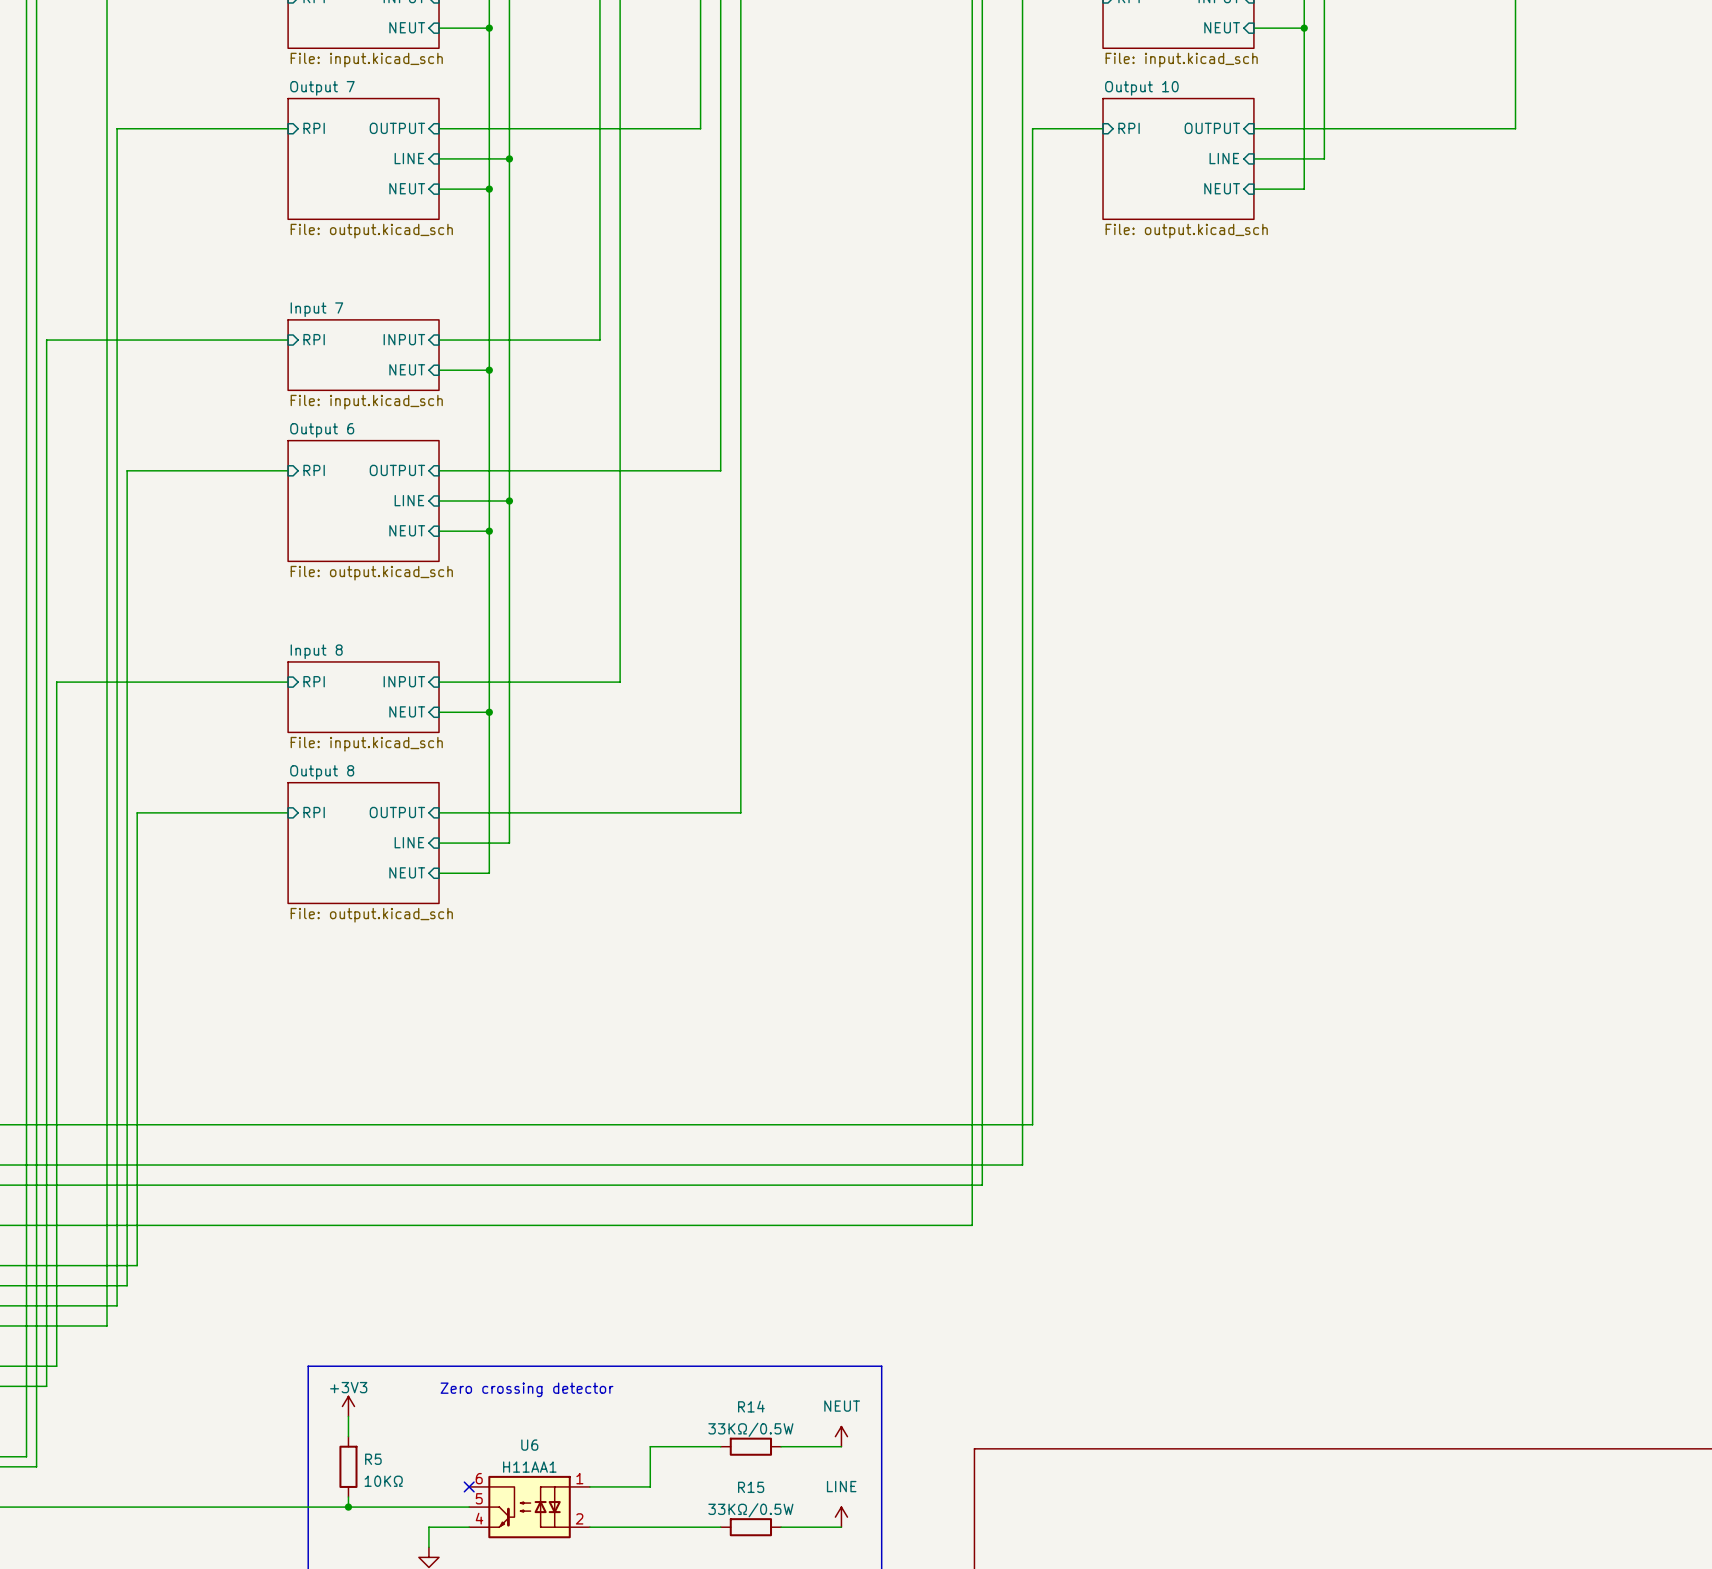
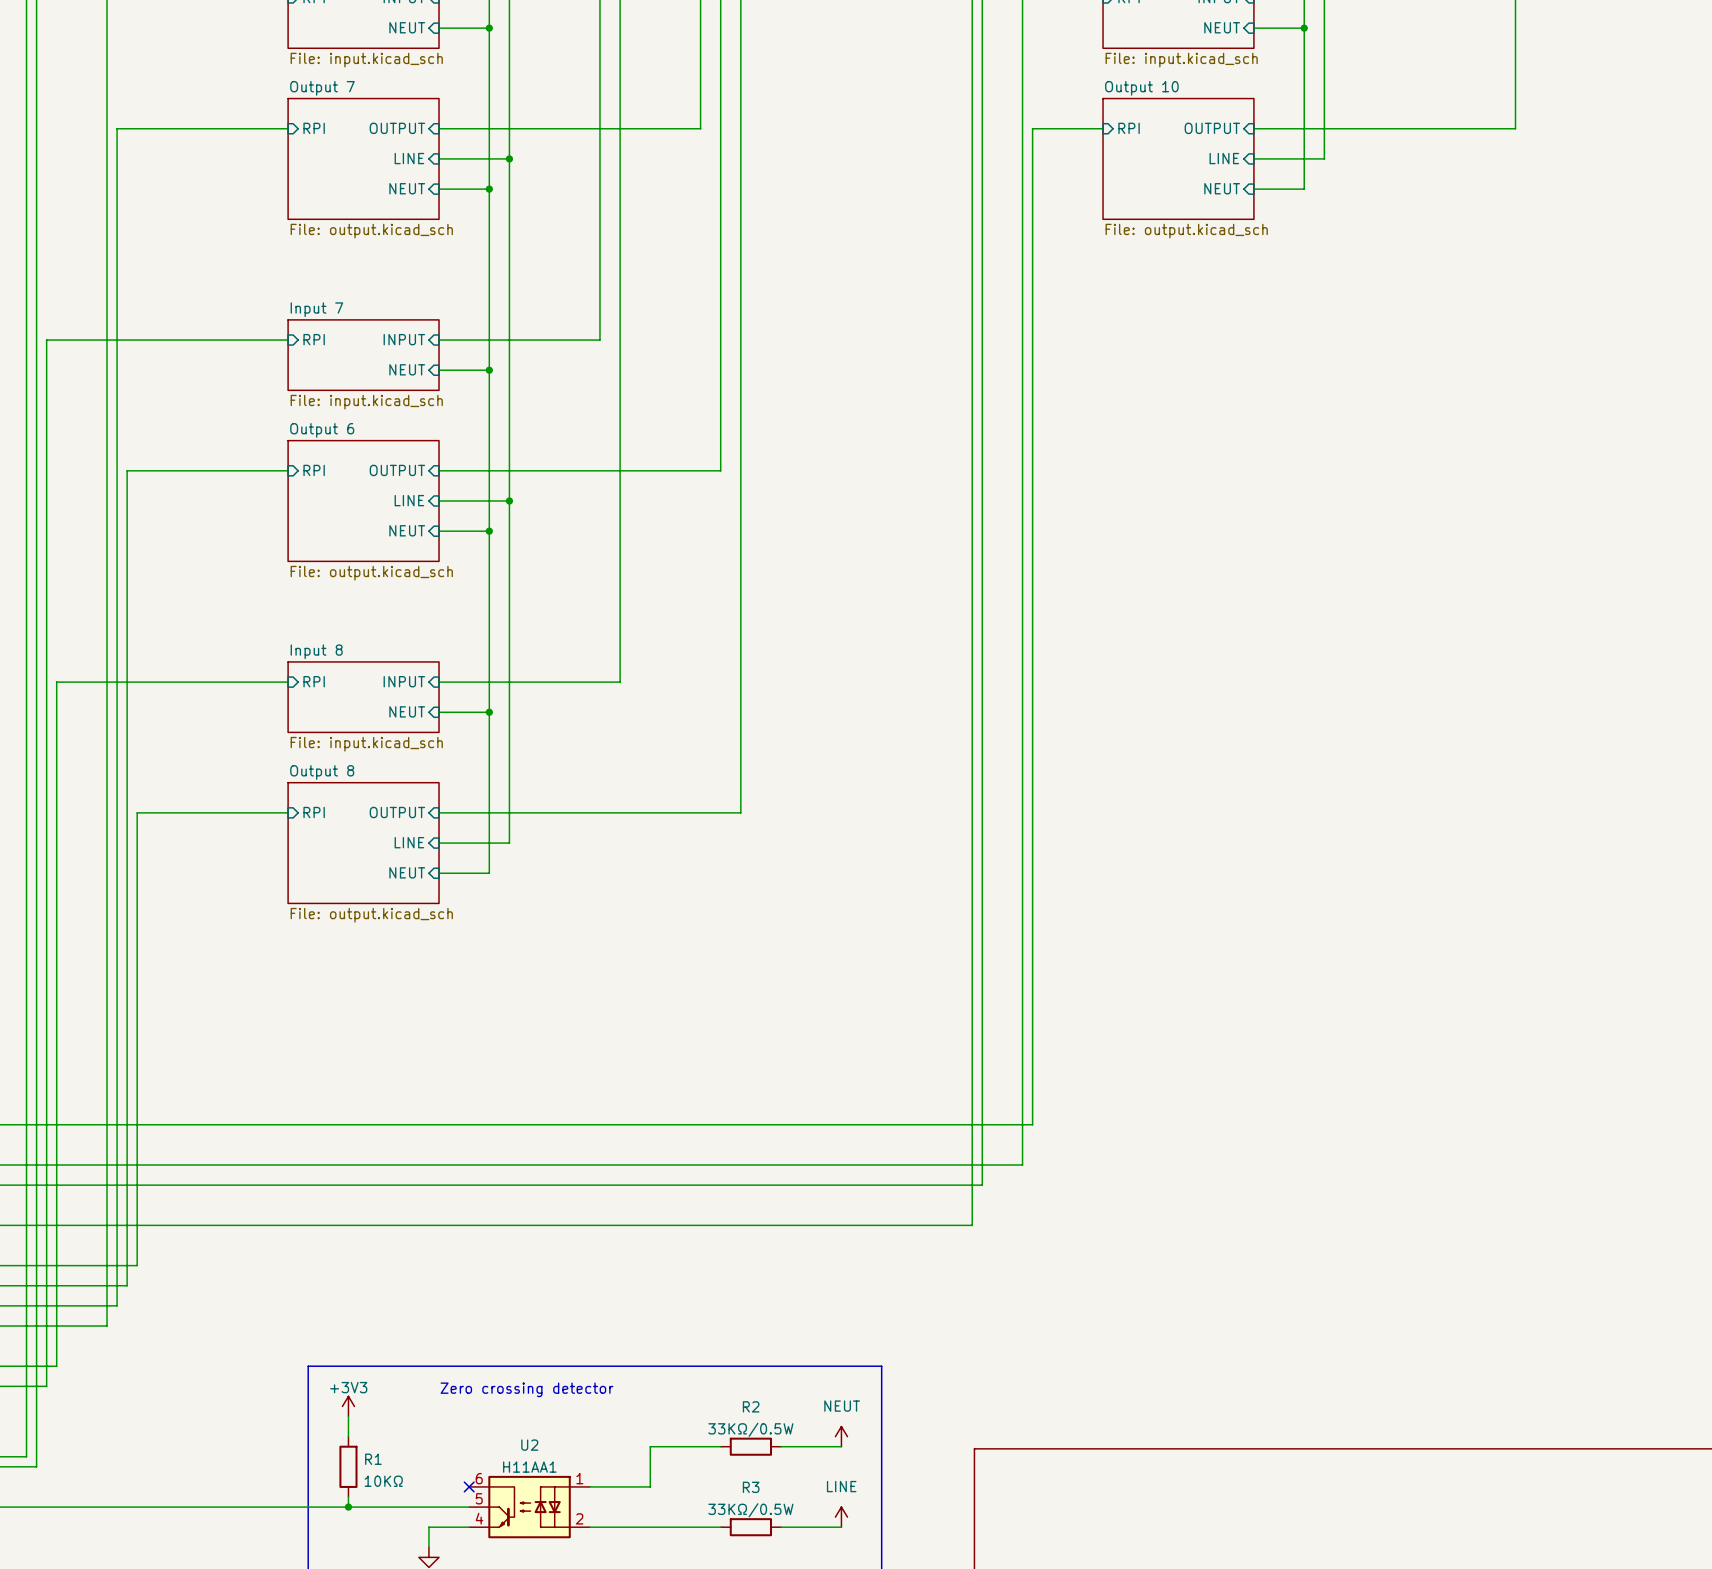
R14 name: R14 (751, 1406) -> R2 (751, 1406)
U6 name: U6 (529, 1445) -> U2 (529, 1445)
R5 name: R5 (373, 1459) -> R1 (373, 1459)
R15 name: R15 (751, 1487) -> R3 (751, 1487)

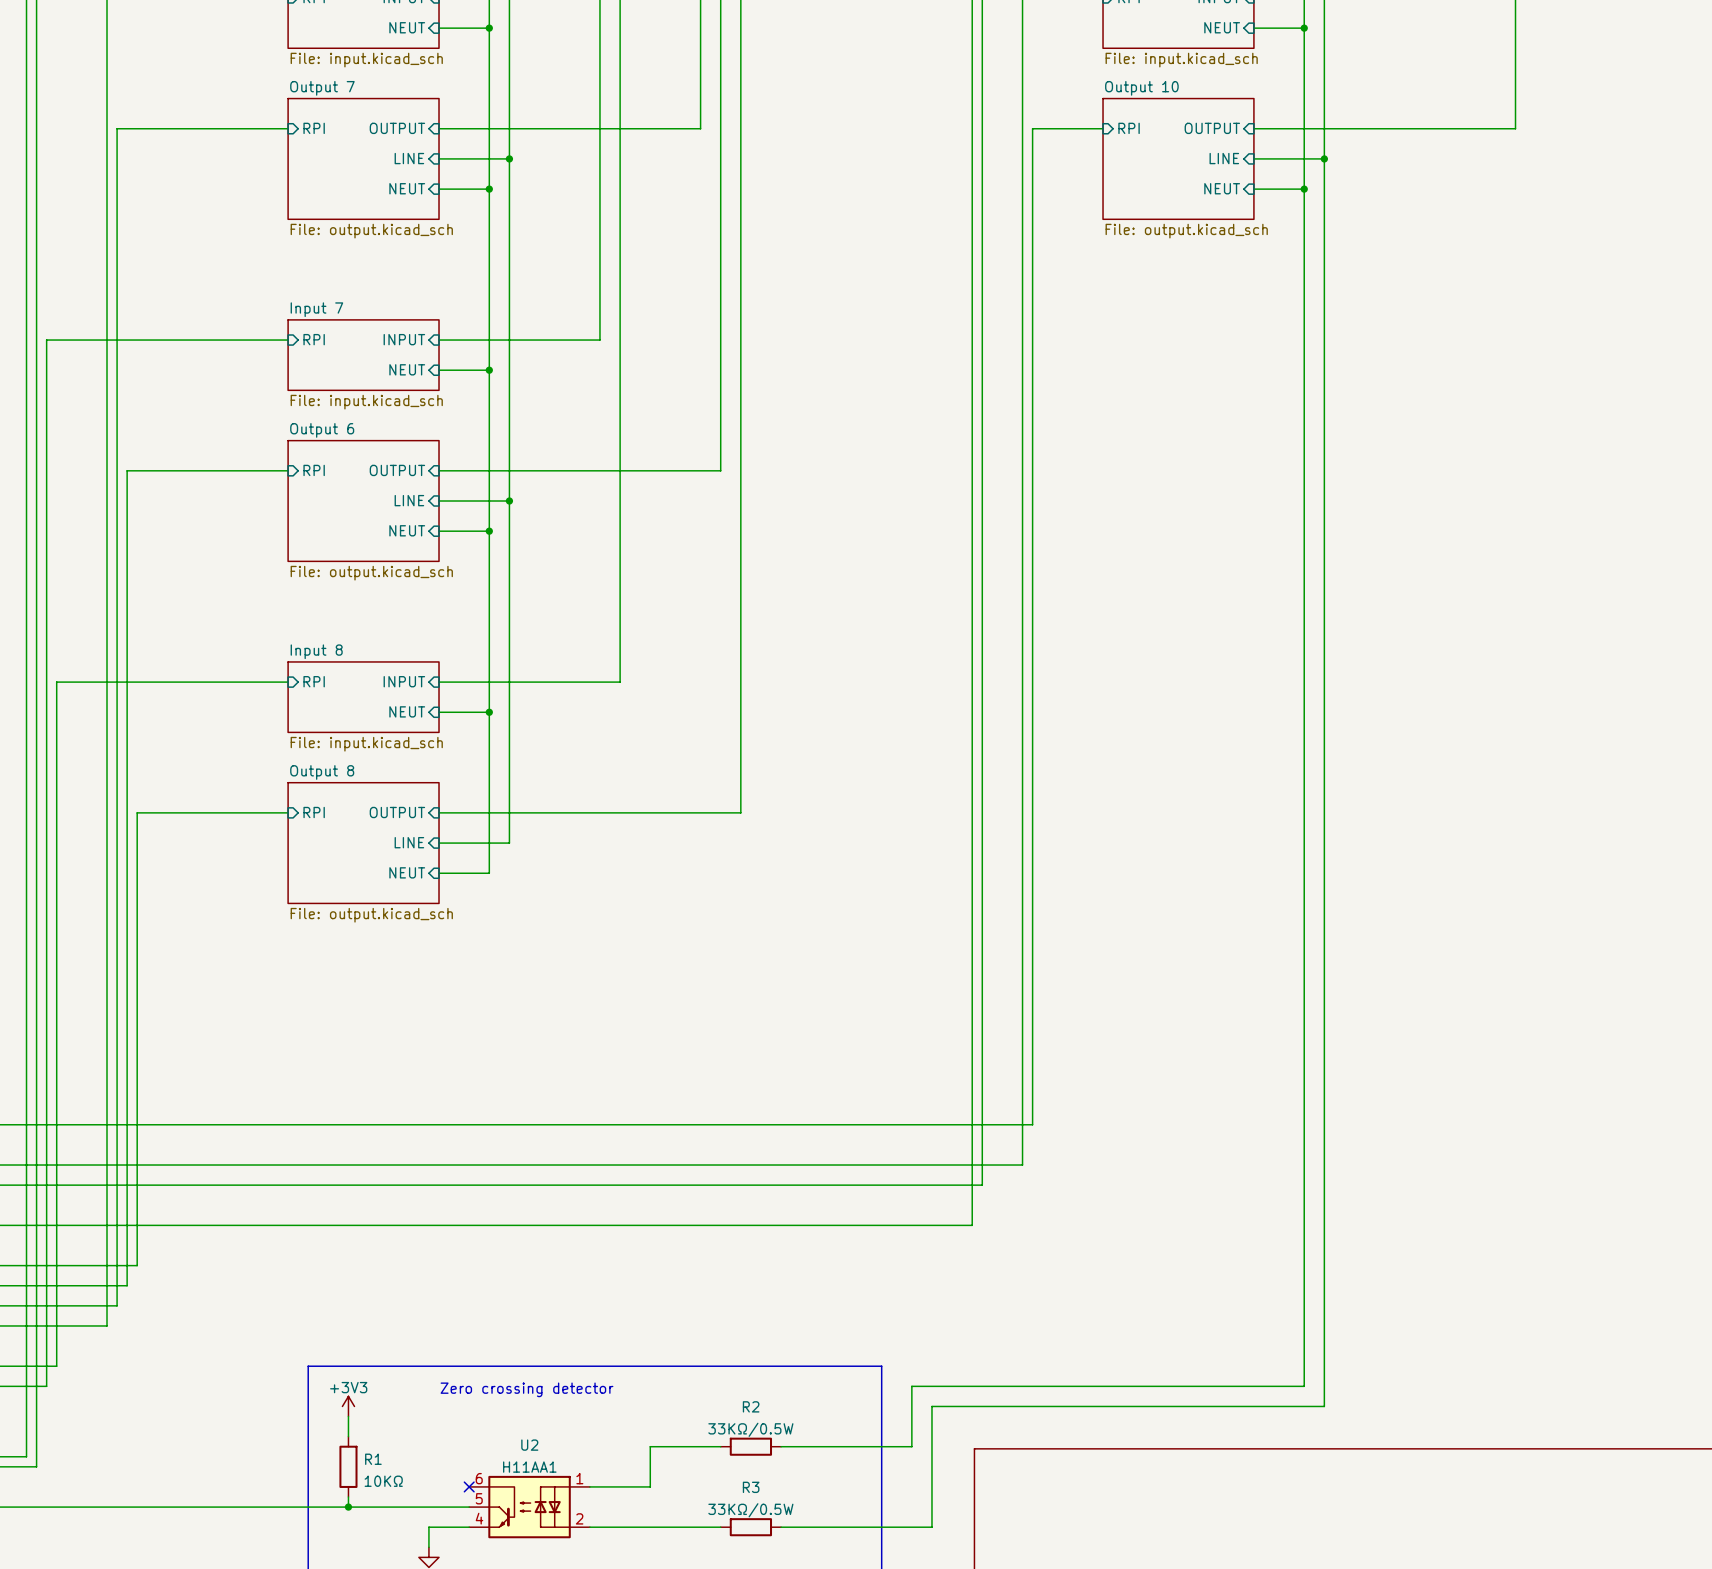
wire: none -> (1324, 158) (1324, 1406) (931, 1406) (931, 1527) (841, 1527)
junction: none -> (1324, 158)
wire: none -> (1304, 189) (1304, 1386) (911, 1386) (911, 1446) (841, 1446)
junction: none -> (1304, 189)
power symbol: NEUT (841, 1436) -> none
power symbol: LINE (841, 1517) -> none

